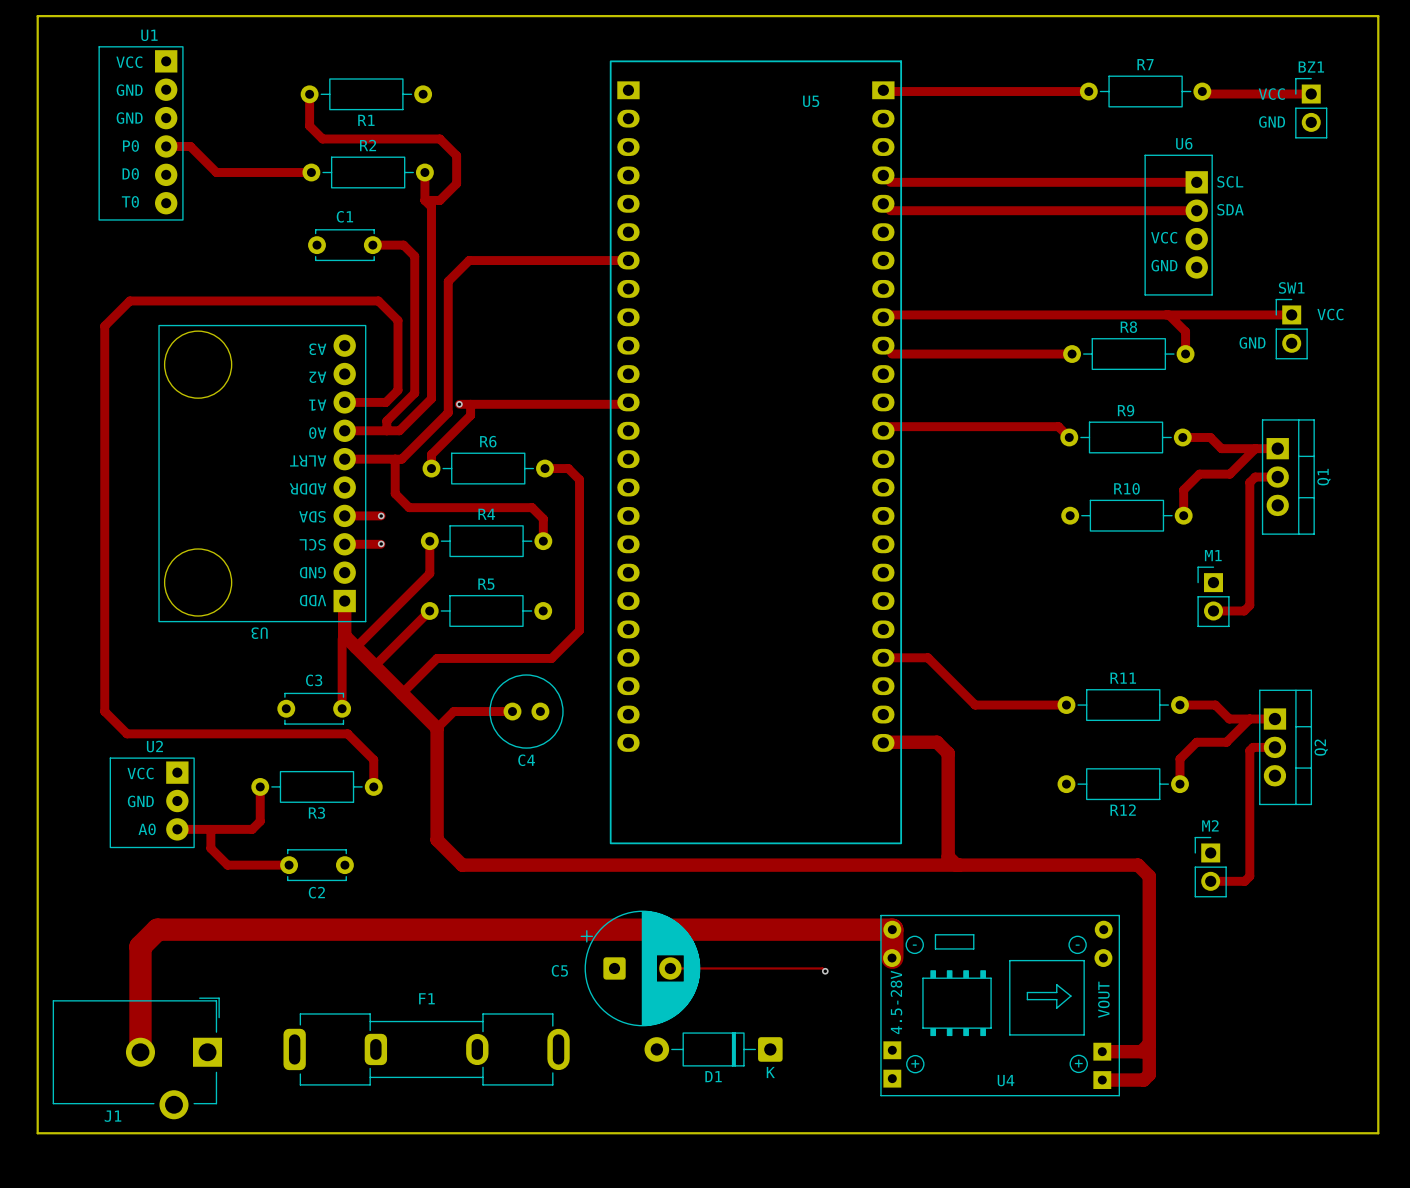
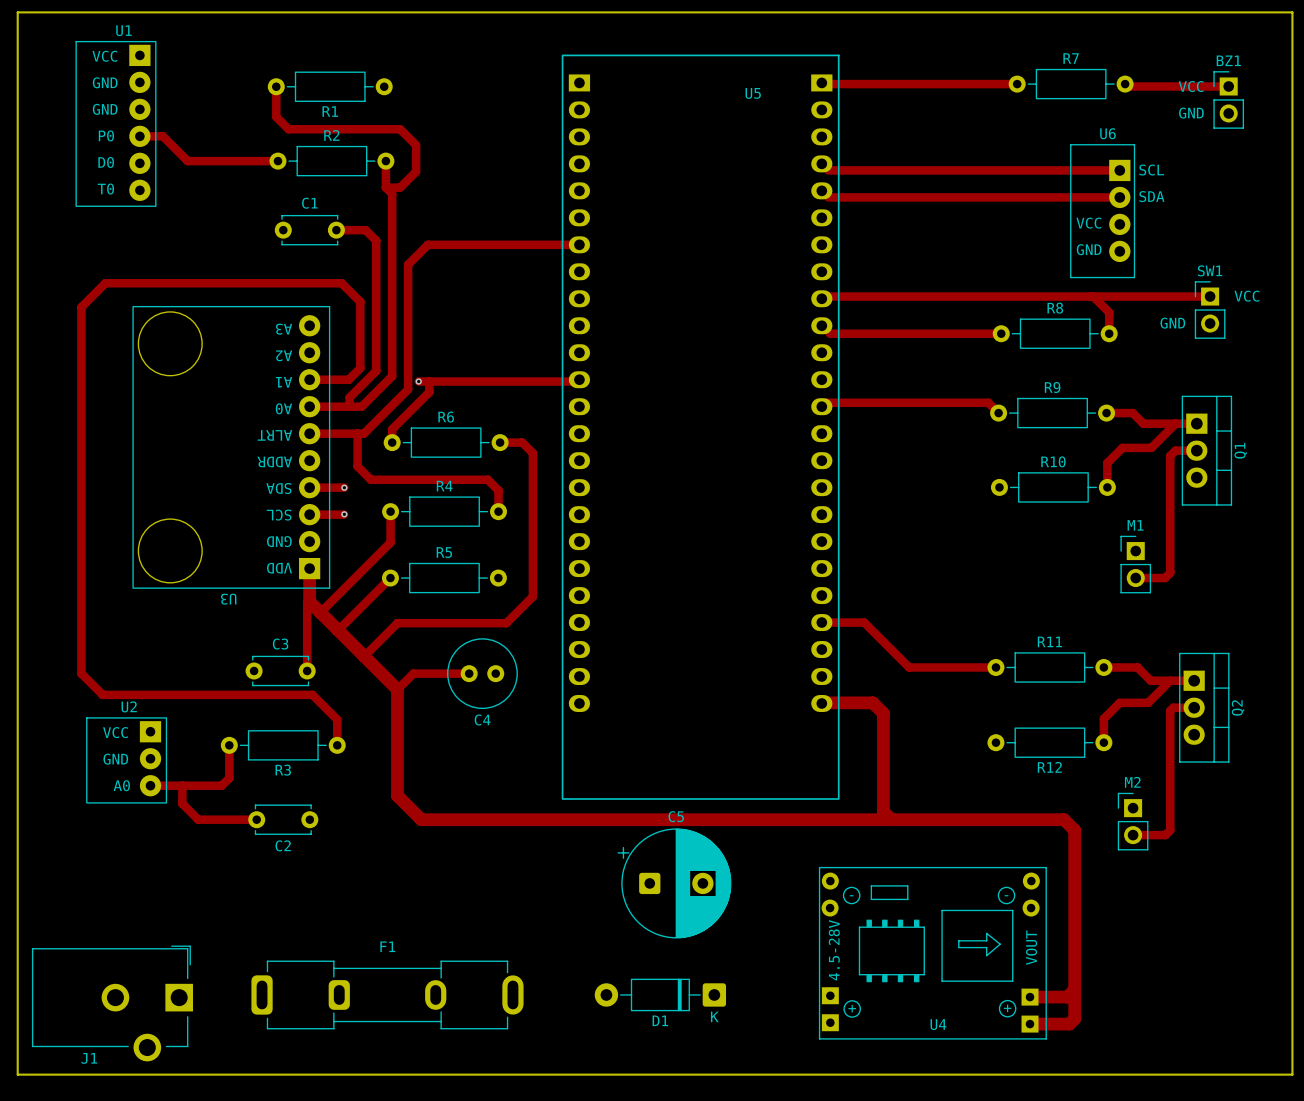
track: (892, 958) (892, 929) (157, 929) (140, 946) (140, 1052) -> none
C5 position: (640, 968) -> (674, 883)
track: (670, 968) (822, 968) (825, 971) -> none
C5 name position: C5 (559, 970) -> C5 (676, 816)
via: (825, 971) -> none

